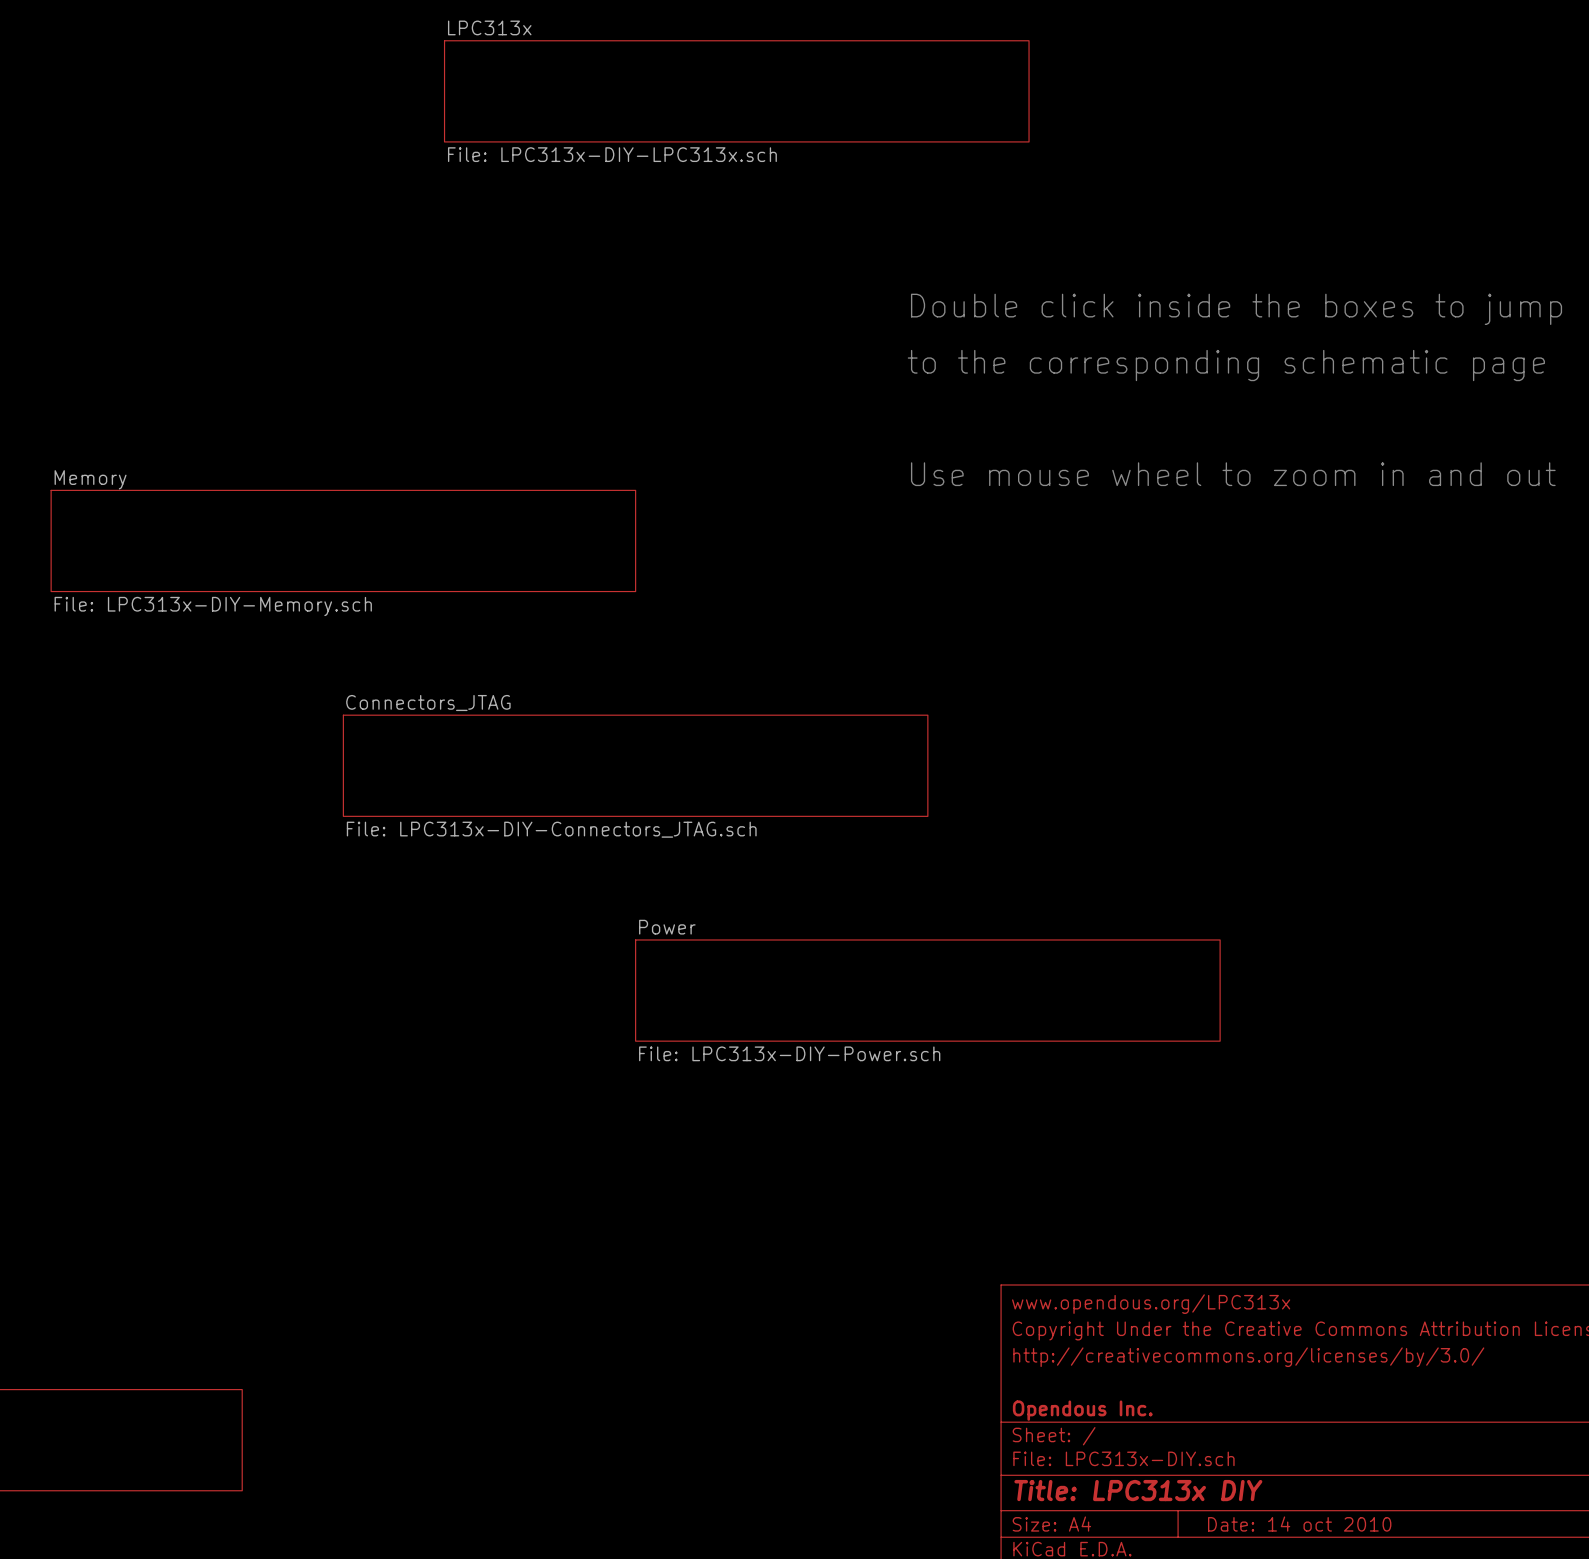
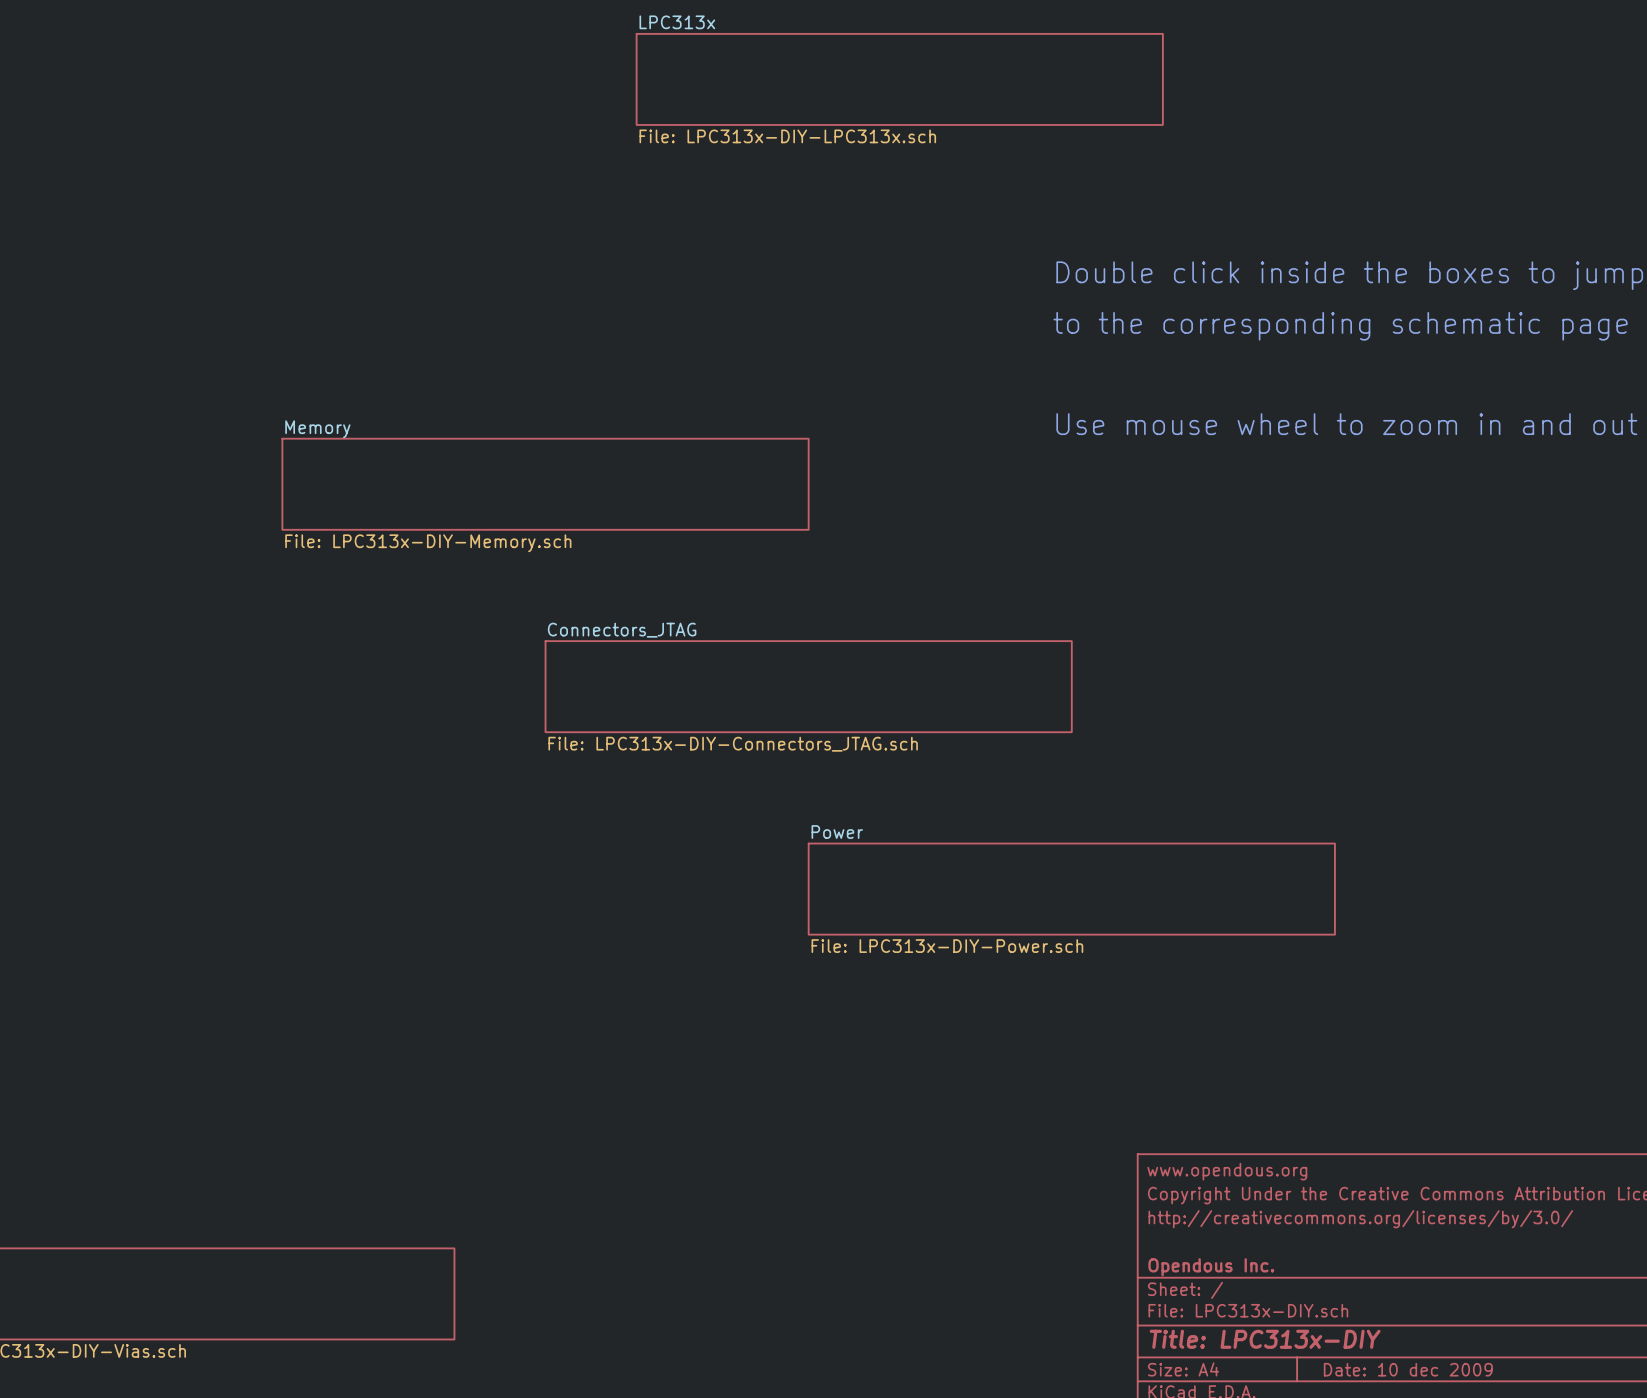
title block: www.opendous.org/LPC313x (1151, 1304) -> www.opendous.org (1227, 1171)
title block: Title: LPC313x DIY (1138, 1490) -> Title: LPC313x-DIY (1265, 1339)
title block: Date: 14 oct 2010 (1299, 1524) -> Date: 10 dec 2009 (1408, 1369)

